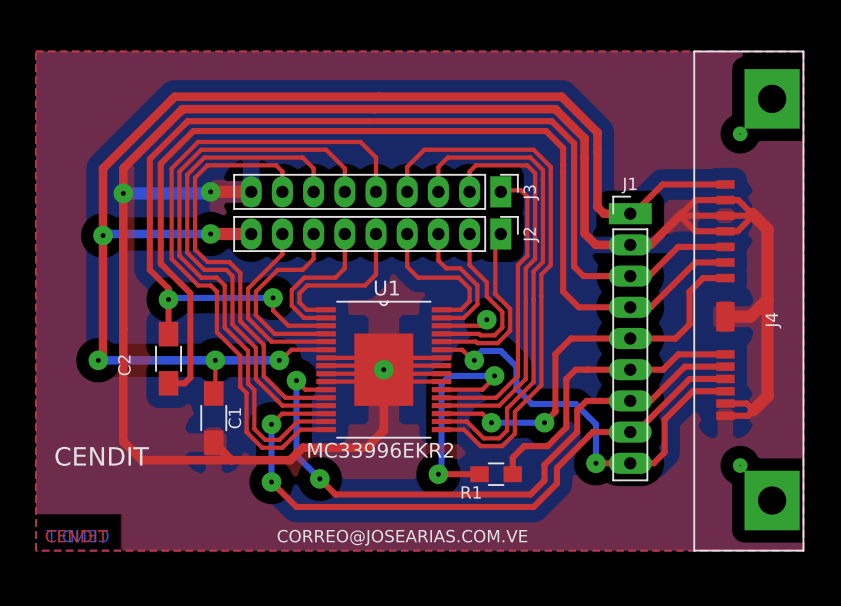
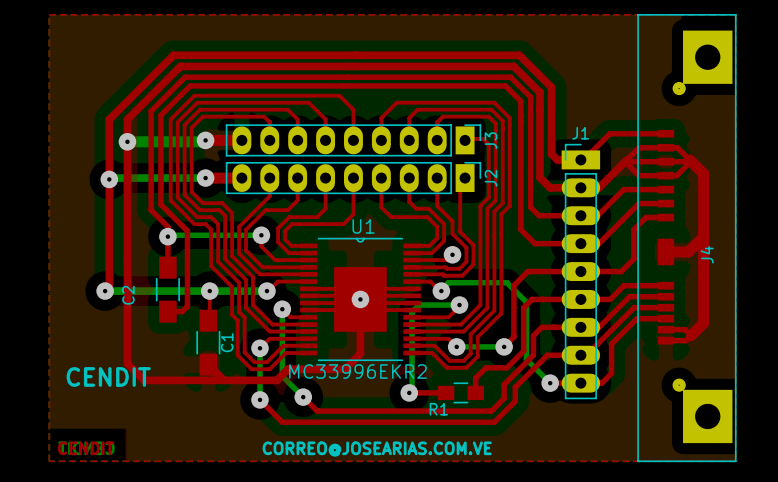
bottom track: (500, 350) (516, 366) (516, 388) (532, 404) (575, 404) (595, 424) (595, 463) -> (465, 282) (506, 282) (526, 302) (526, 359) (550, 383)

